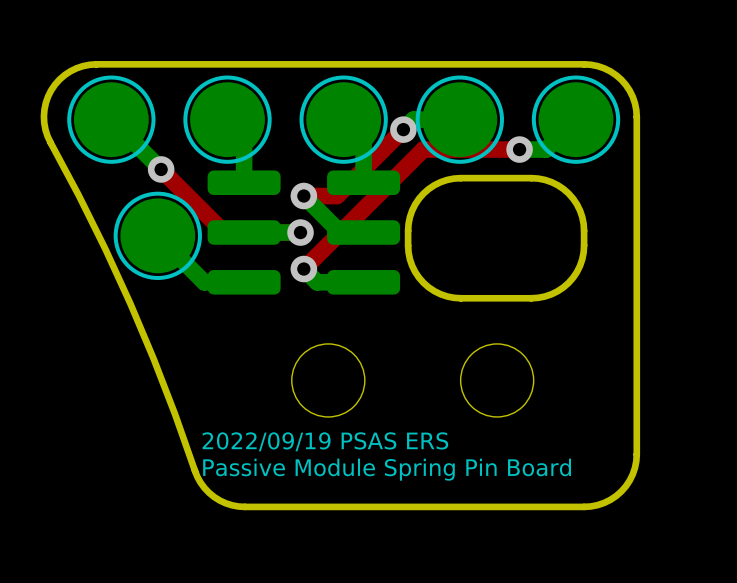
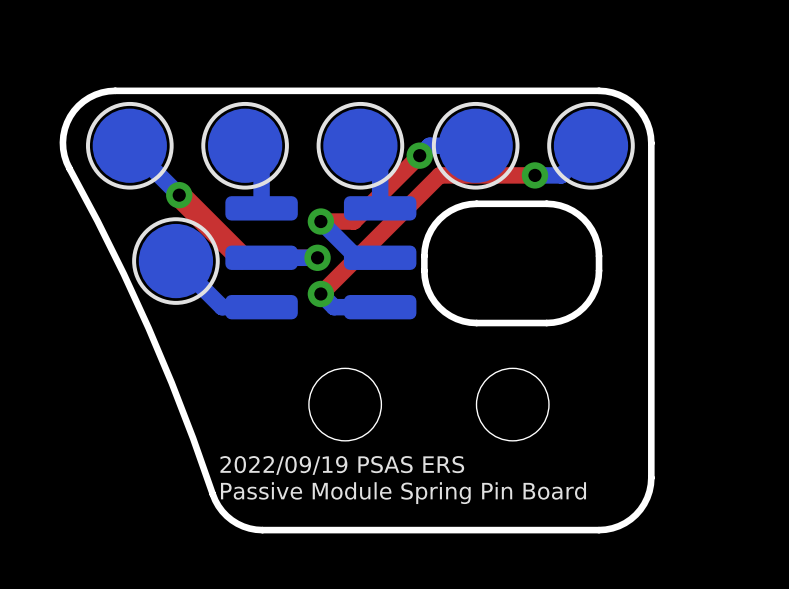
top track width: thin (161, 169) (224, 232) -> thick (179, 195) (241, 257)

